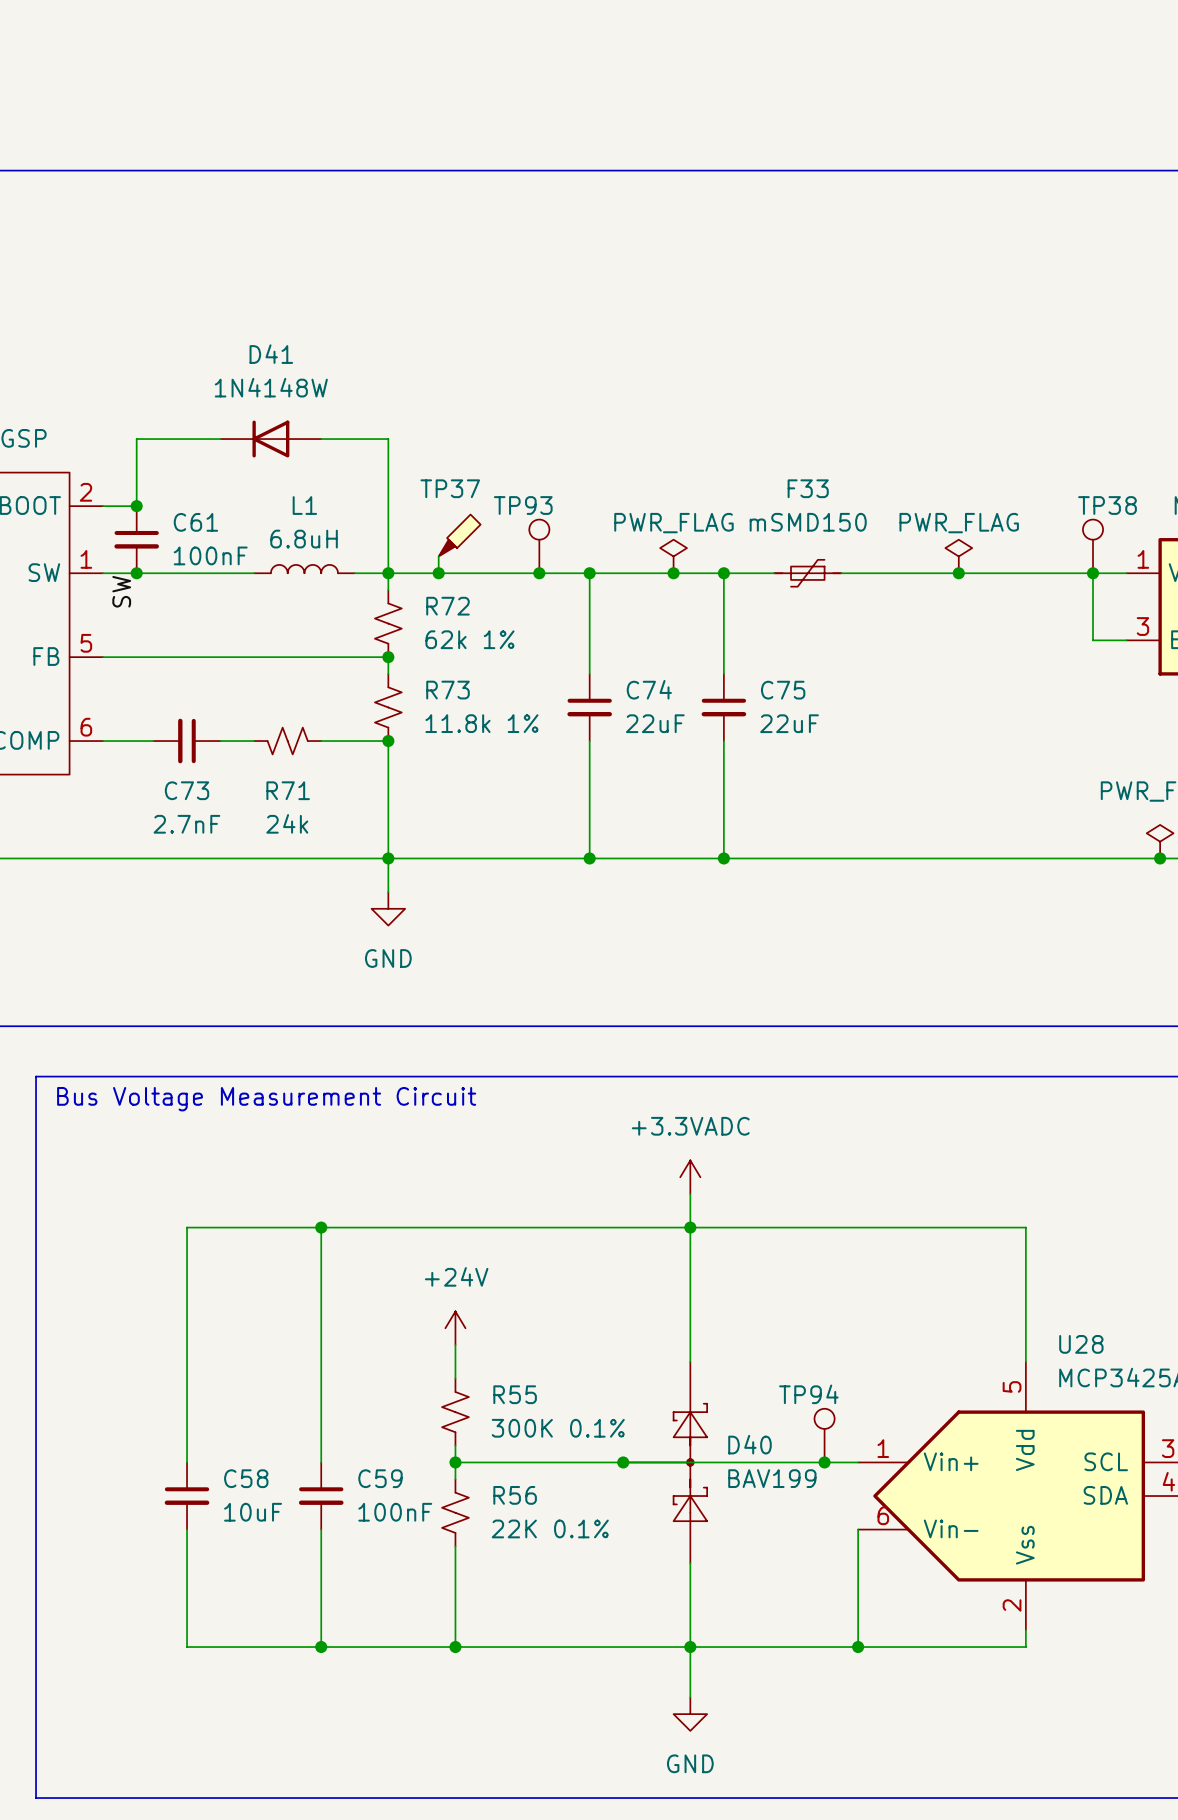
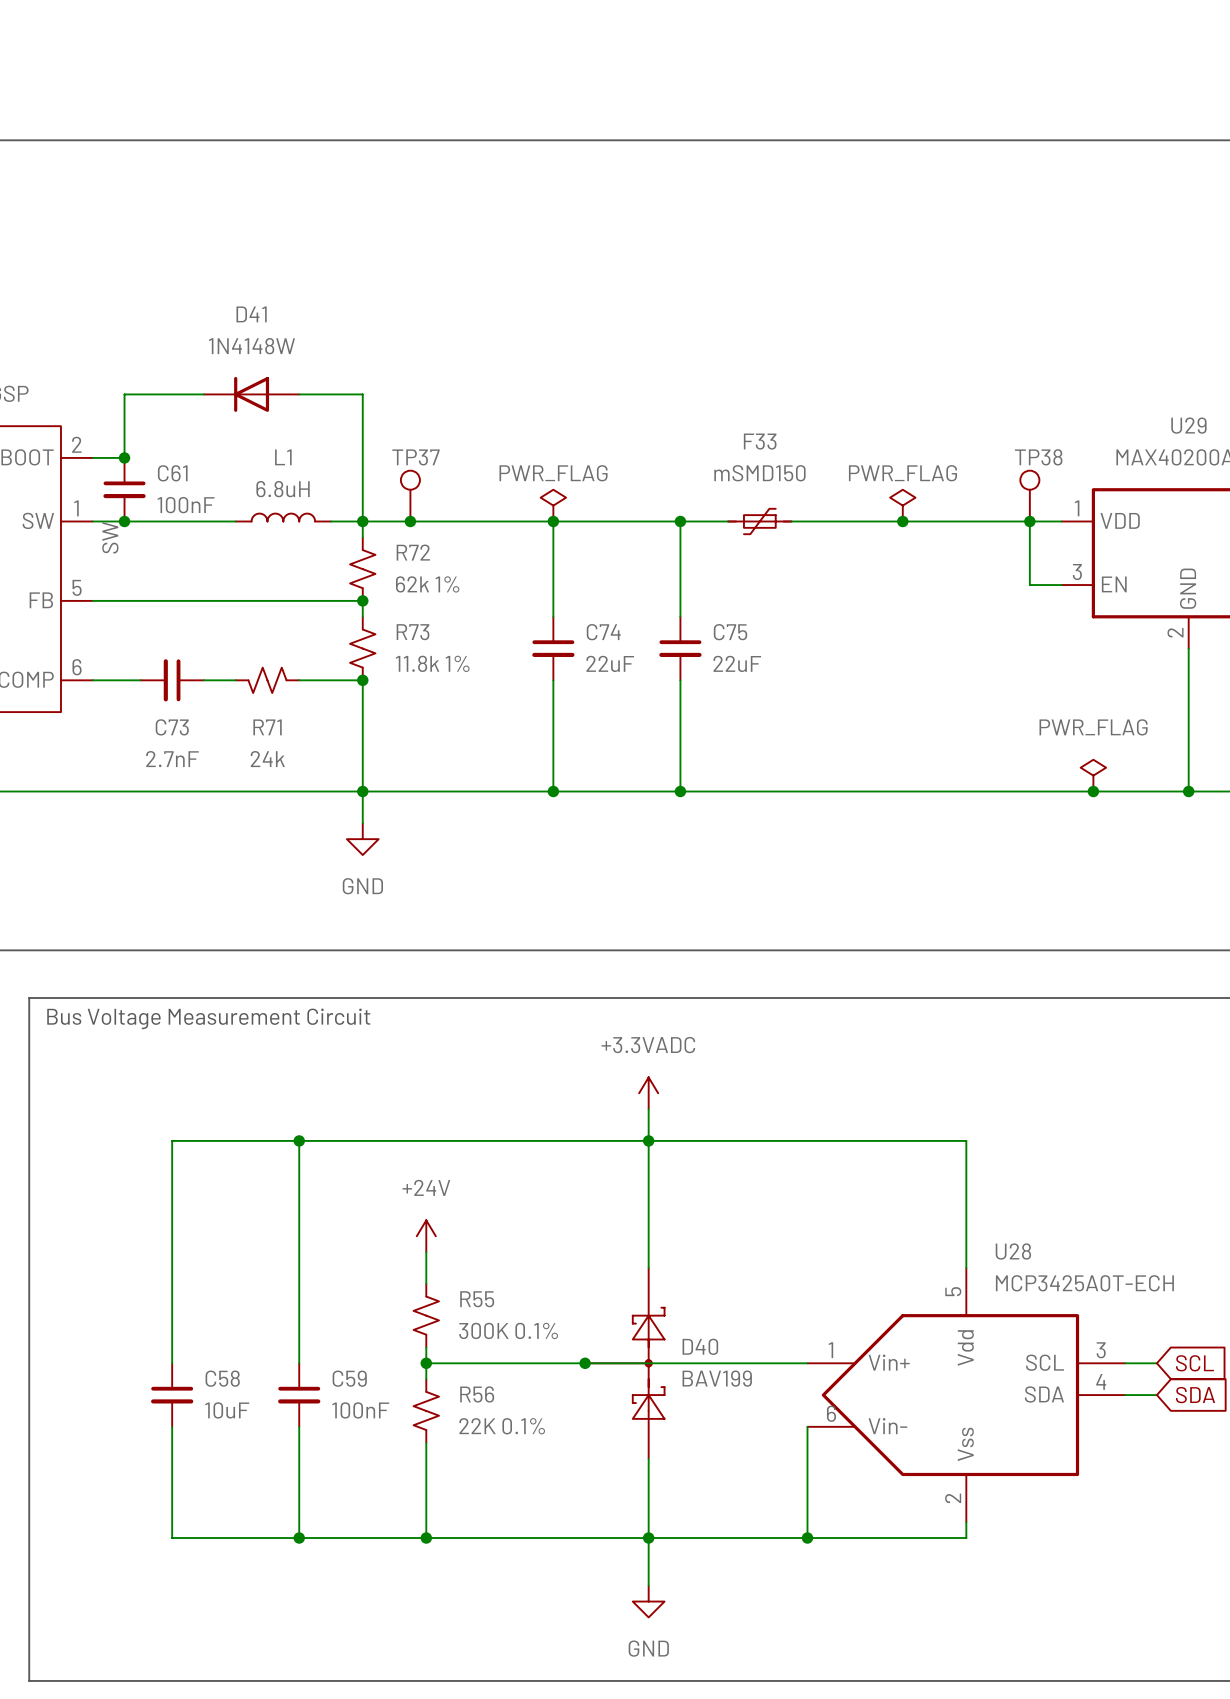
TP37 symbol: [438, 514, 481, 557] -> [400, 470, 420, 522]
TP93: (539, 546) -> none
power symbol position: PWR_FLAG (673, 556) -> PWR_FLAG (553, 505)
junction: (539, 573) -> none
junction: (673, 573) -> none
TP94: (824, 1435) -> none
junction: (824, 1462) -> none

